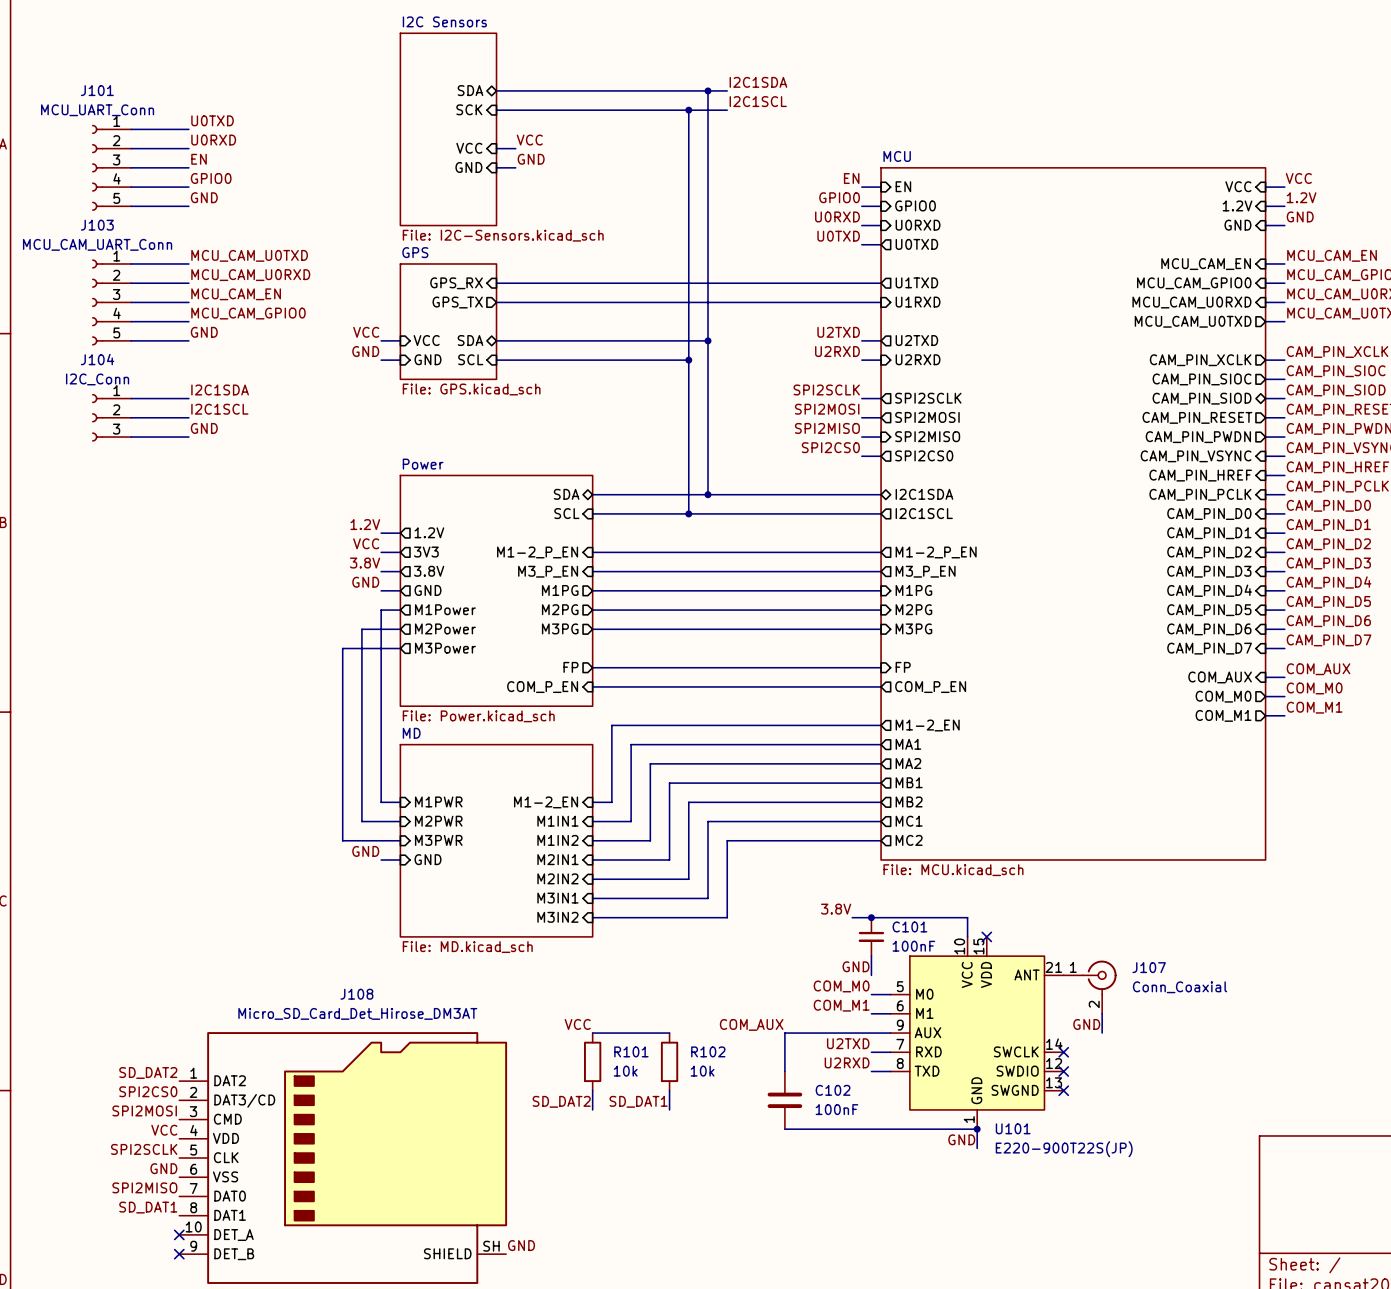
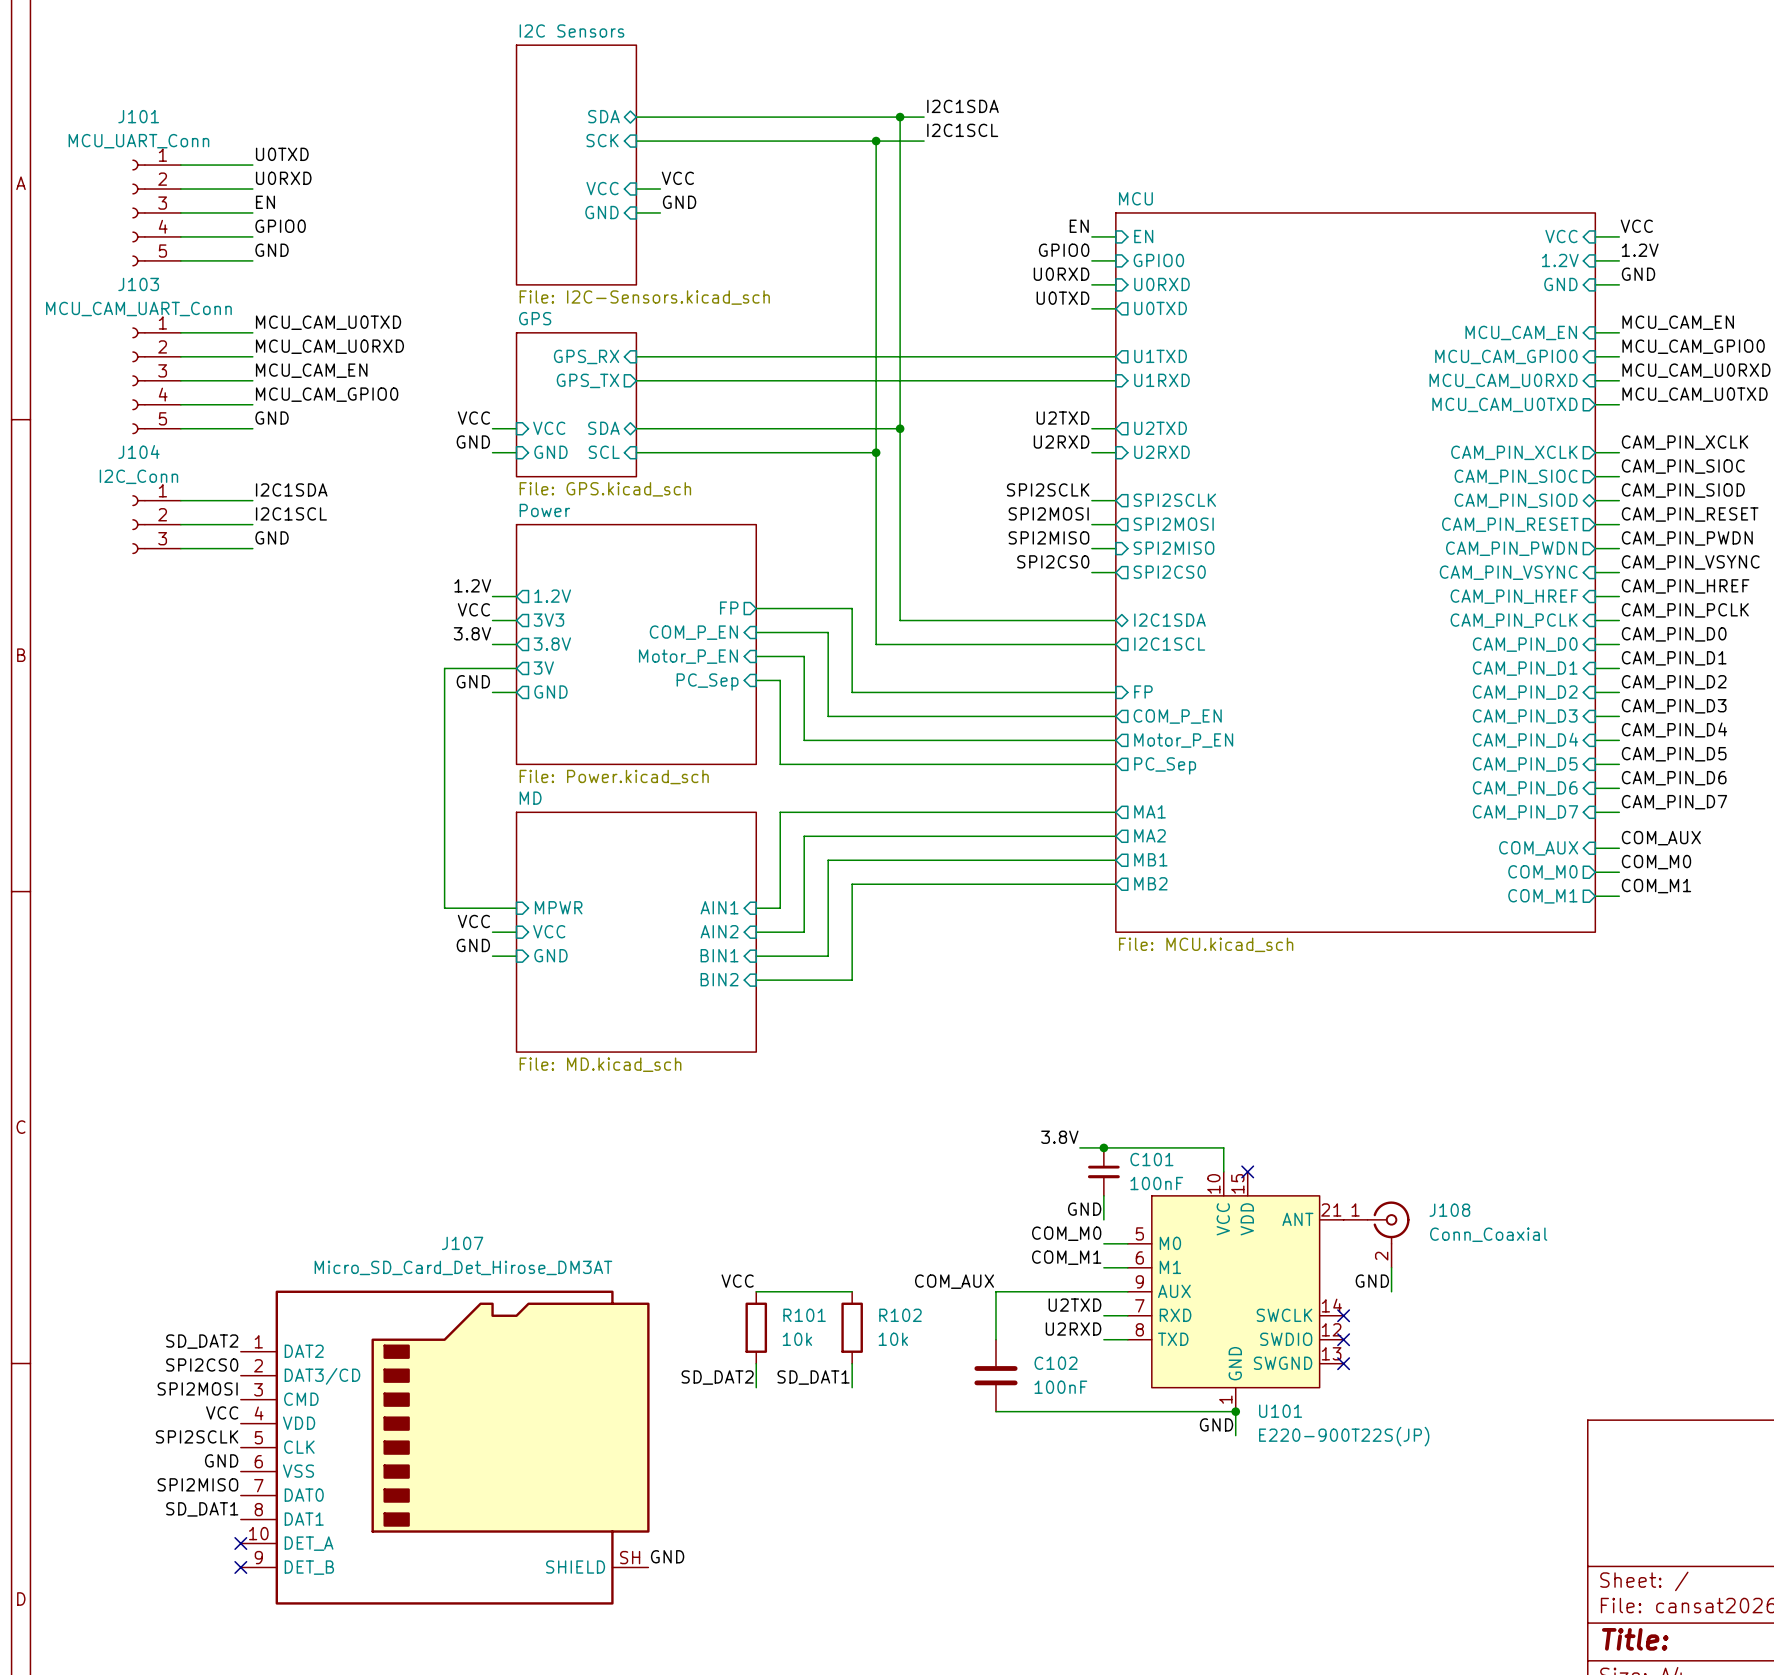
sheet MCU: none -> File: MCU.kicad_sch (1355, 572)
wire: none -> (492, 596) (516, 596)
sheet pin: none -> 1.2V (552, 596)
label: none -> VCC (473, 609)
sheet pin: none -> 3V3 (548, 620)
sheet pin: SDA (566, 494) -> none
wire: (592, 494) (708, 494) -> none
junction: (708, 494) -> none
sheet Power: none -> File: Power.kicad_sch (636, 644)
sheet pin: SCL (566, 513) -> none
wire: (592, 513) (688, 513) -> none
junction: (688, 513) -> none
sheet MCU: File: MCU.kicad_sch (1073, 513) -> none
sheet pin: none -> Motor_P_EN (688, 656)
label position: 1.2V (365, 524) -> 1.2V (472, 585)
sheet pin: 1.2V (429, 532) -> 3V (543, 668)
label: VCC (366, 543) -> GND (473, 681)
sheet pin: none -> PC_Sep (707, 682)
sheet pin: 3V3 (426, 552) -> GND (550, 692)
sheet pin: M1-2_P_EN (537, 552) -> none
wire: (592, 552) (669, 552) -> (756, 608) (852, 608) (852, 692)
sheet pin shape: output (936, 552) -> input (1143, 692)
sheet pin: M1-2_P_EN (936, 552) -> FP (1143, 692)
label position: 3.8V (365, 563) -> 3.8V (472, 633)
wire: (381, 571) (400, 571) -> (492, 620) (516, 620)
sheet pin position: 3.8V (429, 571) -> 3.8V (552, 644)
sheet pin: M3_P_EN (548, 571) -> none
wire: (592, 571) (650, 571) -> (756, 632) (828, 632) (828, 716)
sheet pin: M3_P_EN (925, 571) -> COM_P_EN (1177, 716)
label: GND (365, 582) -> none
wire: (381, 590) (400, 590) -> (492, 644) (516, 644)
sheet pin: GND (428, 590) -> none
sheet Power: File: Power.kicad_sch (496, 590) -> none
sheet pin: M1PG (560, 590) -> none
wire: (592, 590) (631, 590) -> (756, 656) (804, 656) (804, 740)
sheet pin shape: input (913, 590) -> output (1183, 740)
sheet pin: M1PG (913, 590) -> Motor_P_EN (1183, 740)
sheet pin: M1Power (445, 609) -> none
sheet pin: M2PG (560, 609) -> none
sheet pin shape: input (913, 609) -> output (1165, 765)
sheet pin: M2PG (913, 609) -> PC_Sep (1165, 765)
wire: (400, 610) (381, 610) (381, 802) (400, 802) -> none
wire: (592, 610) (611, 610) -> (756, 680) (780, 680) (780, 764)
sheet pin: M2Power (445, 628) -> none
sheet pin: M3PG (560, 628) -> none
sheet pin: M3PG (913, 628) -> none
wire: (400, 629) (361, 629) (361, 821) (400, 821) -> none
wire: (592, 629) (881, 629) -> none
wire: (342, 648) (400, 648) -> (444, 812) (444, 668) (492, 668)
sheet pin: M3Power (445, 648) -> none
sheet pin position: FP (570, 667) -> FP (729, 608)
wire: (592, 667) (631, 667) -> (756, 932) (804, 932) (804, 836)
sheet pin shape: input (903, 667) -> output (1150, 835)
sheet pin: FP (903, 667) -> MA2 (1150, 835)
wire: (592, 686) (650, 686) -> (756, 956) (828, 956) (828, 860)
sheet pin position: COM_P_EN (542, 687) -> COM_P_EN (693, 632)
sheet pin: COM_P_EN (930, 687) -> MB1 (1150, 859)
wire: (342, 725) (342, 840) (400, 840) -> (444, 908) (516, 908)
sheet pin: none -> MPWR (558, 907)
sheet pin: none -> AIN1 (719, 907)
wire: (881, 725) (611, 725) (611, 802) (592, 802) -> (1115, 812) (780, 812) (780, 908) (756, 908)
sheet pin: M1-2_EN (927, 725) -> none
label: none -> VCC (473, 921)
wire: none -> (492, 932) (516, 932)
sheet pin: none -> VCC (549, 931)
sheet pin: none -> AIN2 (719, 931)
wire: (881, 744) (631, 744) (631, 821) (592, 821) -> none
sheet pin position: MA1 (908, 744) -> MA1 (1150, 811)
label: none -> GND (473, 945)
sheet pin: none -> GND (550, 955)
sheet pin: none -> BIN1 (719, 955)
wire: (881, 763) (650, 763) (650, 840) (592, 840) -> none
sheet pin: MA2 (908, 763) -> none
sheet pin: none -> BIN2 (719, 979)
sheet pin: MB1 (909, 782) -> none
wire: (881, 783) (669, 783) (669, 860) (592, 860) -> (1115, 884) (852, 884) (852, 980) (756, 980)
sheet pin: M1PWR (438, 801) -> none
sheet pin position: MB2 (909, 801) -> MB2 (1150, 883)
sheet pin: M1-2_EN (546, 802) -> none
wire: (881, 802) (688, 802) (688, 879) (592, 879) -> none
sheet pin: M2PWR (438, 821) -> none
sheet pin: M1IN1 (557, 821) -> none
wire: (881, 821) (708, 821) (708, 898) (592, 898) -> none
sheet pin: MC1 (909, 821) -> none
sheet pin: M3PWR (438, 840) -> none
sheet MD position: (496, 840) -> (636, 932)
sheet pin: M1IN2 (557, 840) -> none
wire: (881, 840) (727, 840) (727, 917) (592, 917) -> none
sheet pin: MC2 (909, 840) -> none
label: GND (365, 851) -> none
sheet pin: GND (428, 859) -> none
sheet pin: M2IN1 (557, 859) -> none
wire: (381, 860) (400, 860) -> (492, 956) (516, 956)
sheet pin: M2IN2 (557, 878) -> none
sheet pin: M3IN1 (557, 898) -> none
sheet pin: M3IN2 (557, 917) -> none
J107 name: J107 (1149, 967) -> J108 (1449, 1210)
J108 name: J108 (356, 994) -> J107 (462, 1243)

